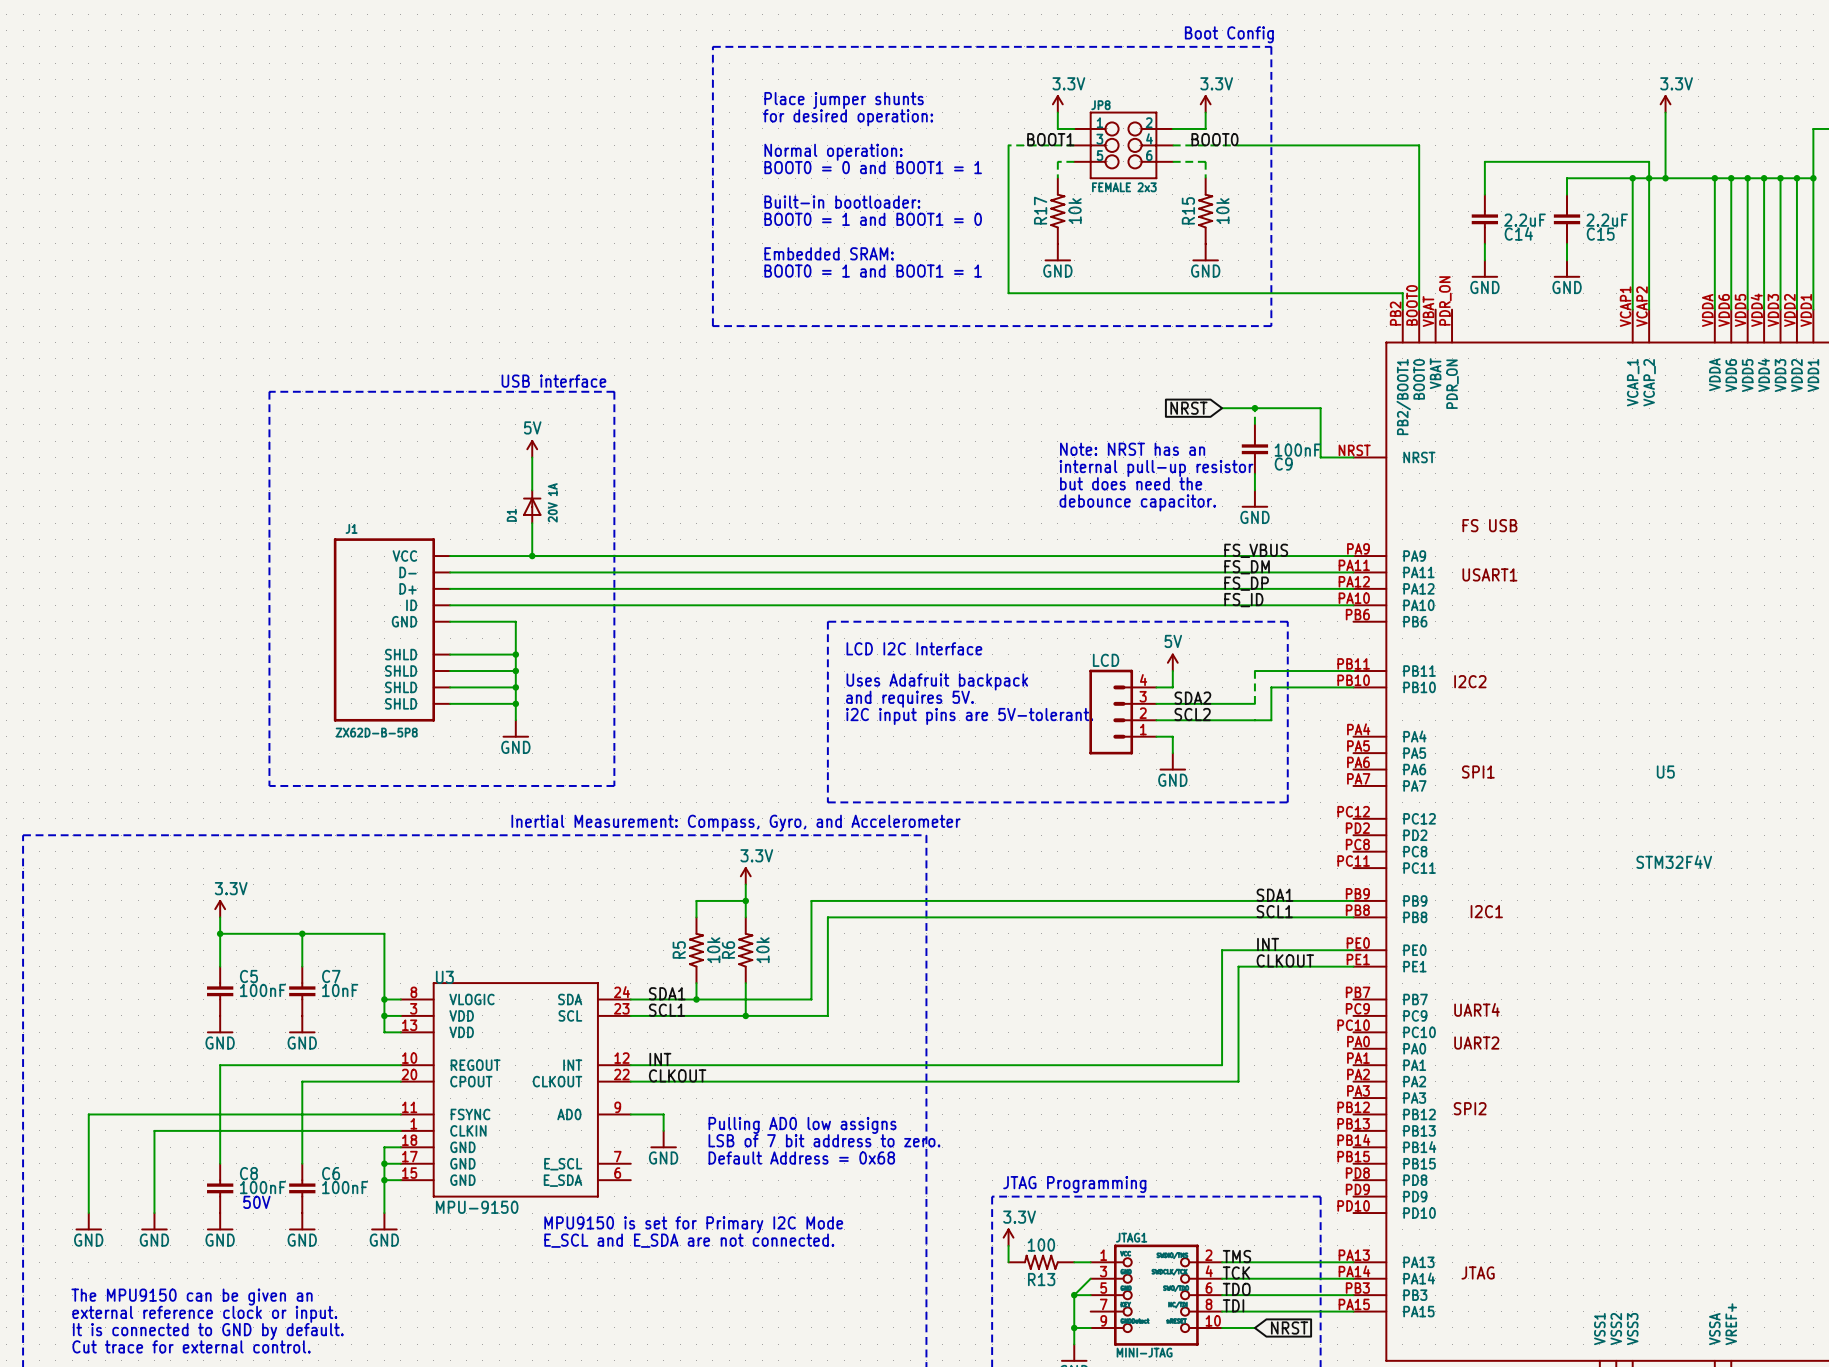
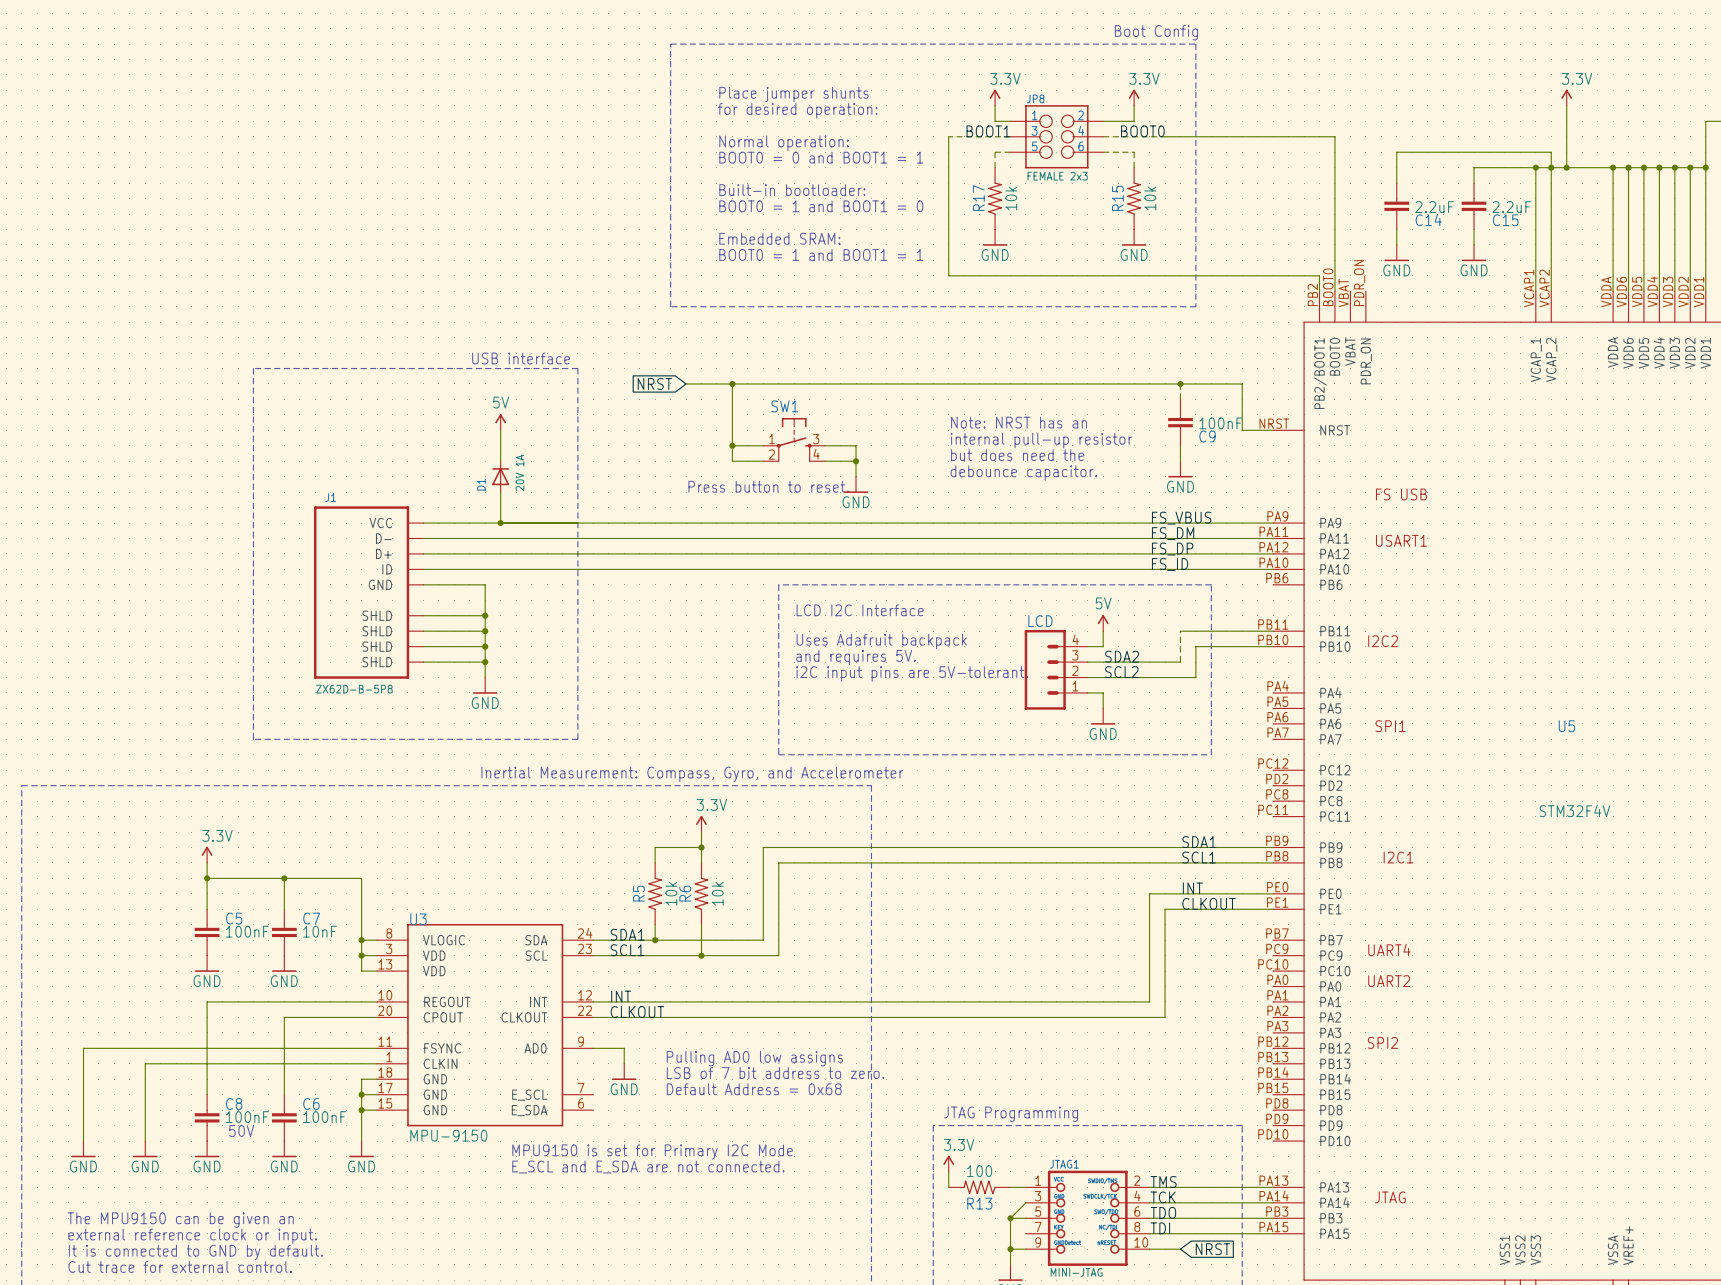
global label: none -> NRST (654, 383)
wire: none -> (686, 383) (1149, 383)
wire: none -> (732, 383) (732, 461) (763, 461)
junction: none -> (732, 383)
global label: NRST (1188, 408) -> none
text position: Note: NRST has an (1132, 449) -> Note: NRST has an (1019, 422)
SW1: none -> (794, 439)
text position: internal pull-up resistor (1156, 468) -> internal pull-up resistor (1041, 440)
wire: none -> (732, 445) (763, 445)
junction: none -> (732, 445)
wire: none -> (825, 445) (856, 445) (856, 476)
text position: but does need the (1131, 483) -> but does need the (1017, 455)
wire: none -> (825, 461) (856, 461)
junction: none -> (856, 461)
text position: debounce capacitor. (1137, 502) -> debounce capacitor. (1023, 473)
power symbol: none -> GND (856, 484)
text: none -> Press button to reset. (768, 486)

